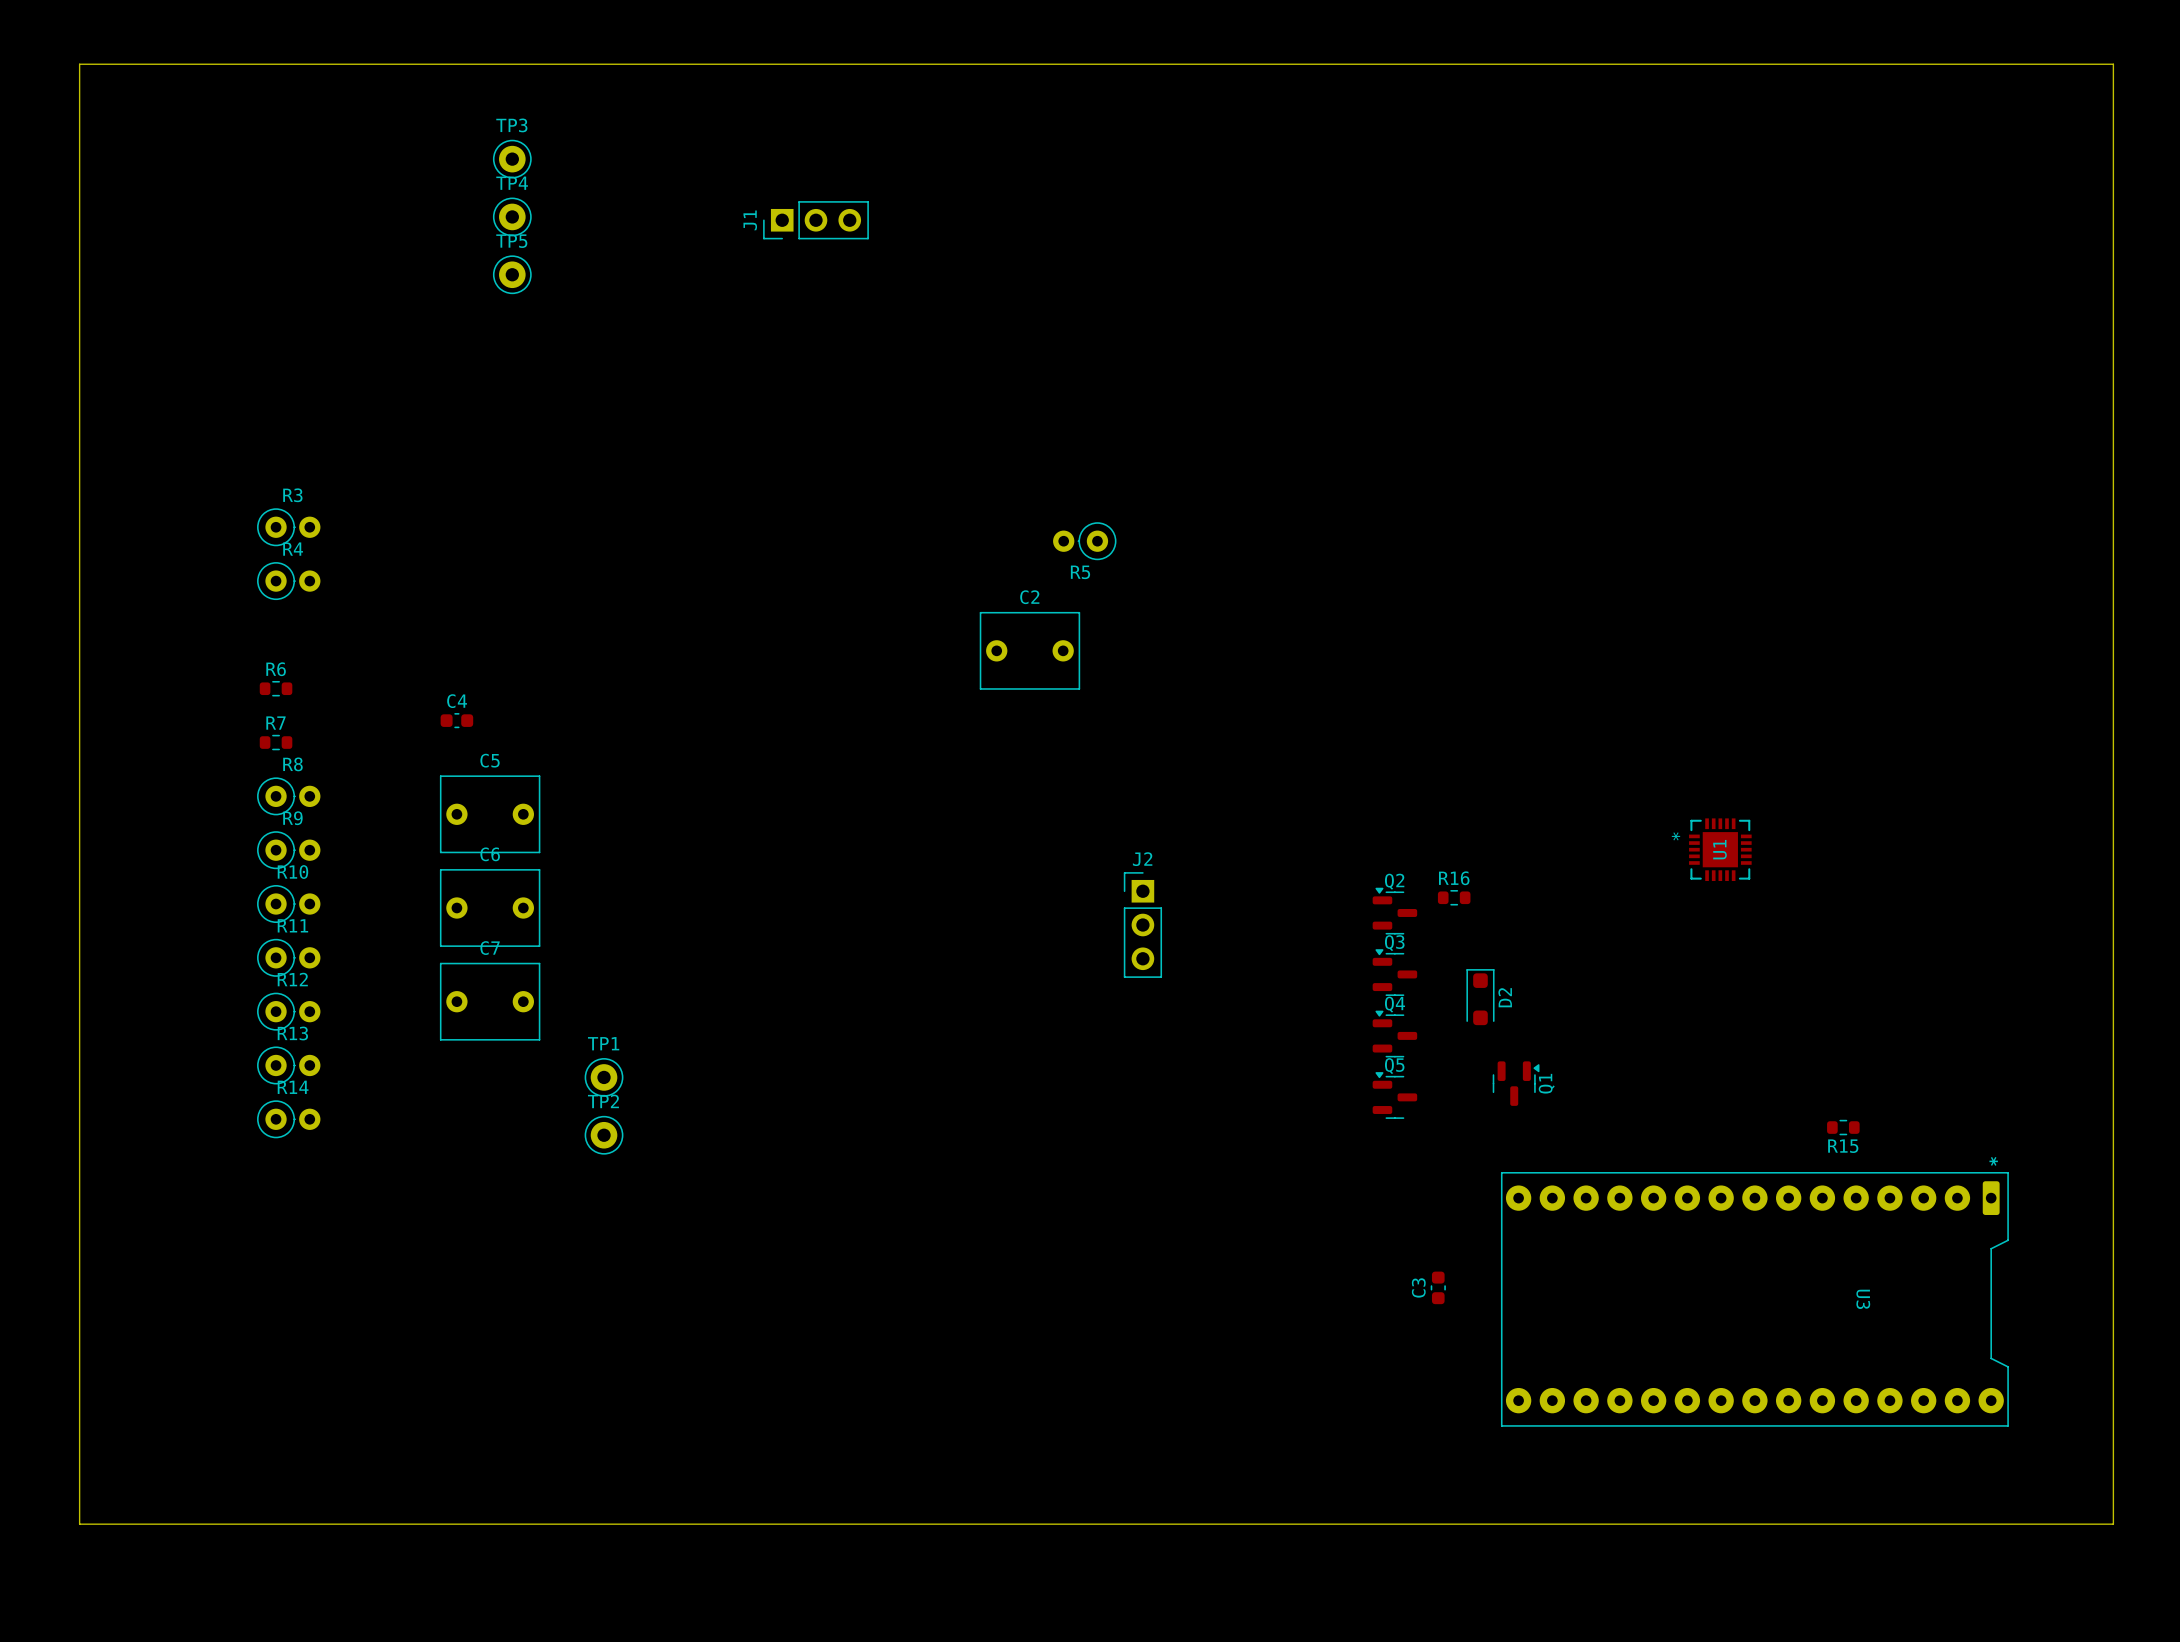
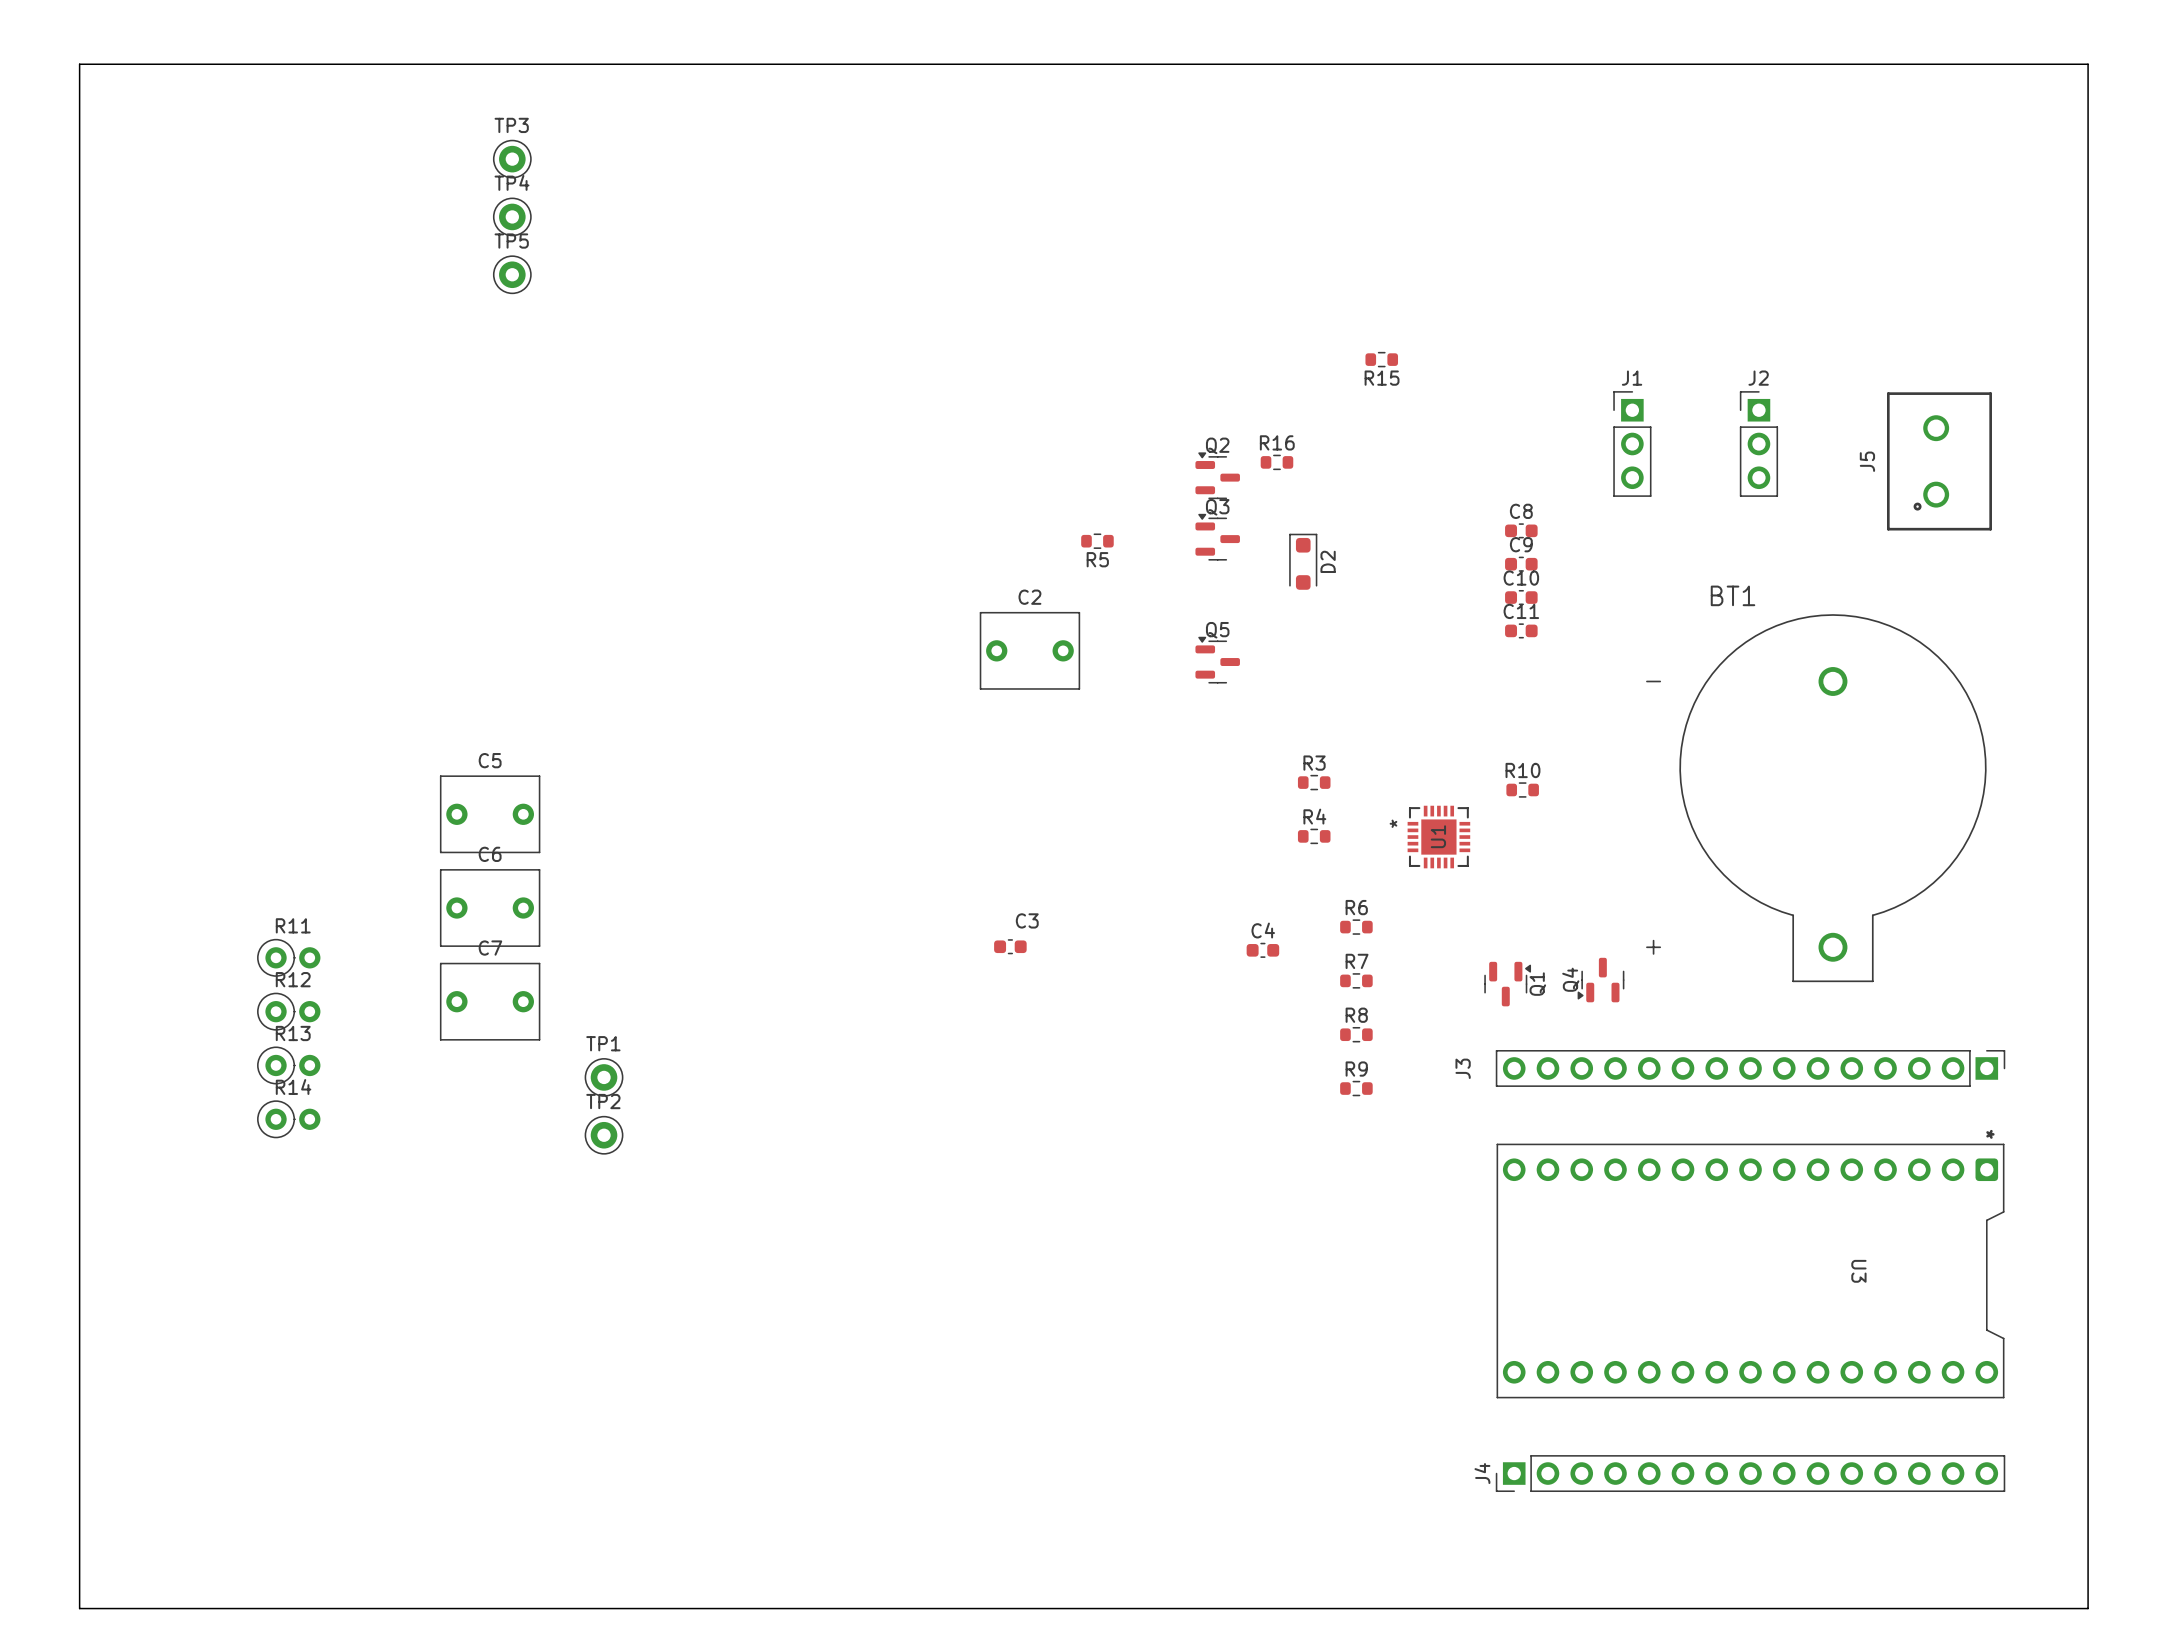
board edge: (2088, 64) (2113, 64) (2113, 1524) (79, 1524) -> (2088, 64) (2088, 1608) (79, 1608) (79, 1524)
J1 rotation: 0° (815, 220) -> 90° clockwise (1632, 443)
J1 position: (815, 220) -> (1632, 443)
J5: none -> (1939, 461)
R3 footprint: [257, 508, 321, 547] -> [1297, 774, 1331, 791]
R5 footprint: [1053, 522, 1117, 561] -> [1081, 533, 1114, 549]
C8: none -> (1521, 530)
R4 footprint: [257, 562, 321, 601] -> [1297, 828, 1331, 845]
C9: none -> (1521, 564)
C10: none -> (1521, 597)
C11: none -> (1521, 630)
R6 position: (276, 688) -> (1356, 927)
C4 position: (456, 720) -> (1262, 950)
R7 position: (276, 742) -> (1356, 980)
R8 footprint: [257, 777, 321, 816] -> [1340, 1026, 1373, 1043]
BT1: none -> (1816, 798)
R9 footprint: [257, 831, 321, 870] -> [1340, 1080, 1373, 1097]
U1 position: (1720, 849) -> (1438, 837)
R10 footprint: [257, 885, 321, 924] -> [1506, 782, 1539, 798]
R16 position: (1454, 897) -> (1276, 462)
Q2 position: (1394, 911) -> (1217, 475)
J2 position: (1142, 925) -> (1758, 443)
Q3 position: (1394, 972) -> (1217, 537)
D2 position: (1480, 997) -> (1303, 561)
Q4 rotation: 0° (1394, 1034) -> 90° counterclockwise (1601, 980)
Q4 position: (1394, 1034) -> (1601, 980)
J3: none -> (1750, 1068)
Q1 position: (1516, 1083) -> (1507, 984)
Q5 position: (1394, 1095) -> (1217, 660)
R15 position: (1843, 1127) -> (1381, 359)
U3 footprint: [1500, 1172, 2009, 1427] -> [1496, 1143, 2005, 1399]
C3 rotation: 0° (1438, 1287) -> 90° clockwise (1010, 946)
C3 position: (1438, 1287) -> (1010, 946)
J4: none -> (1750, 1473)

